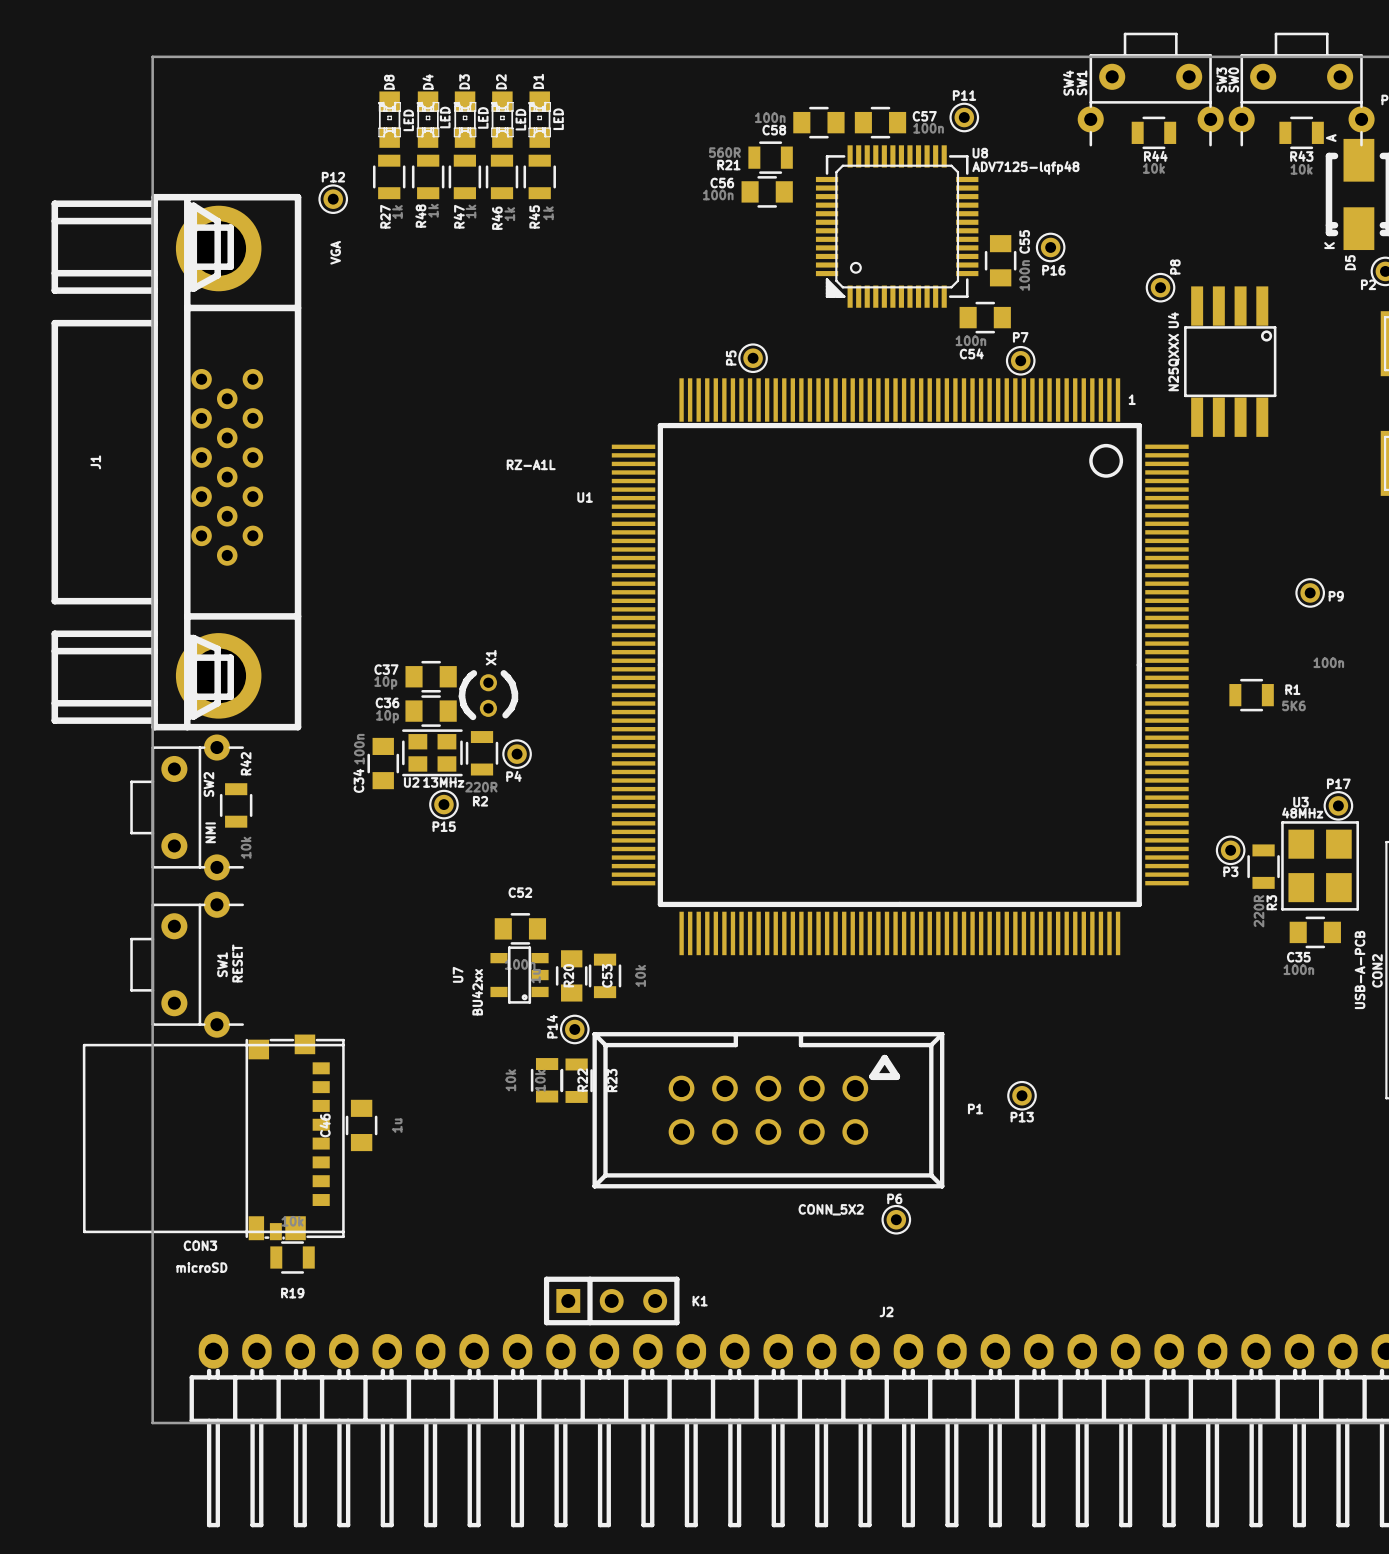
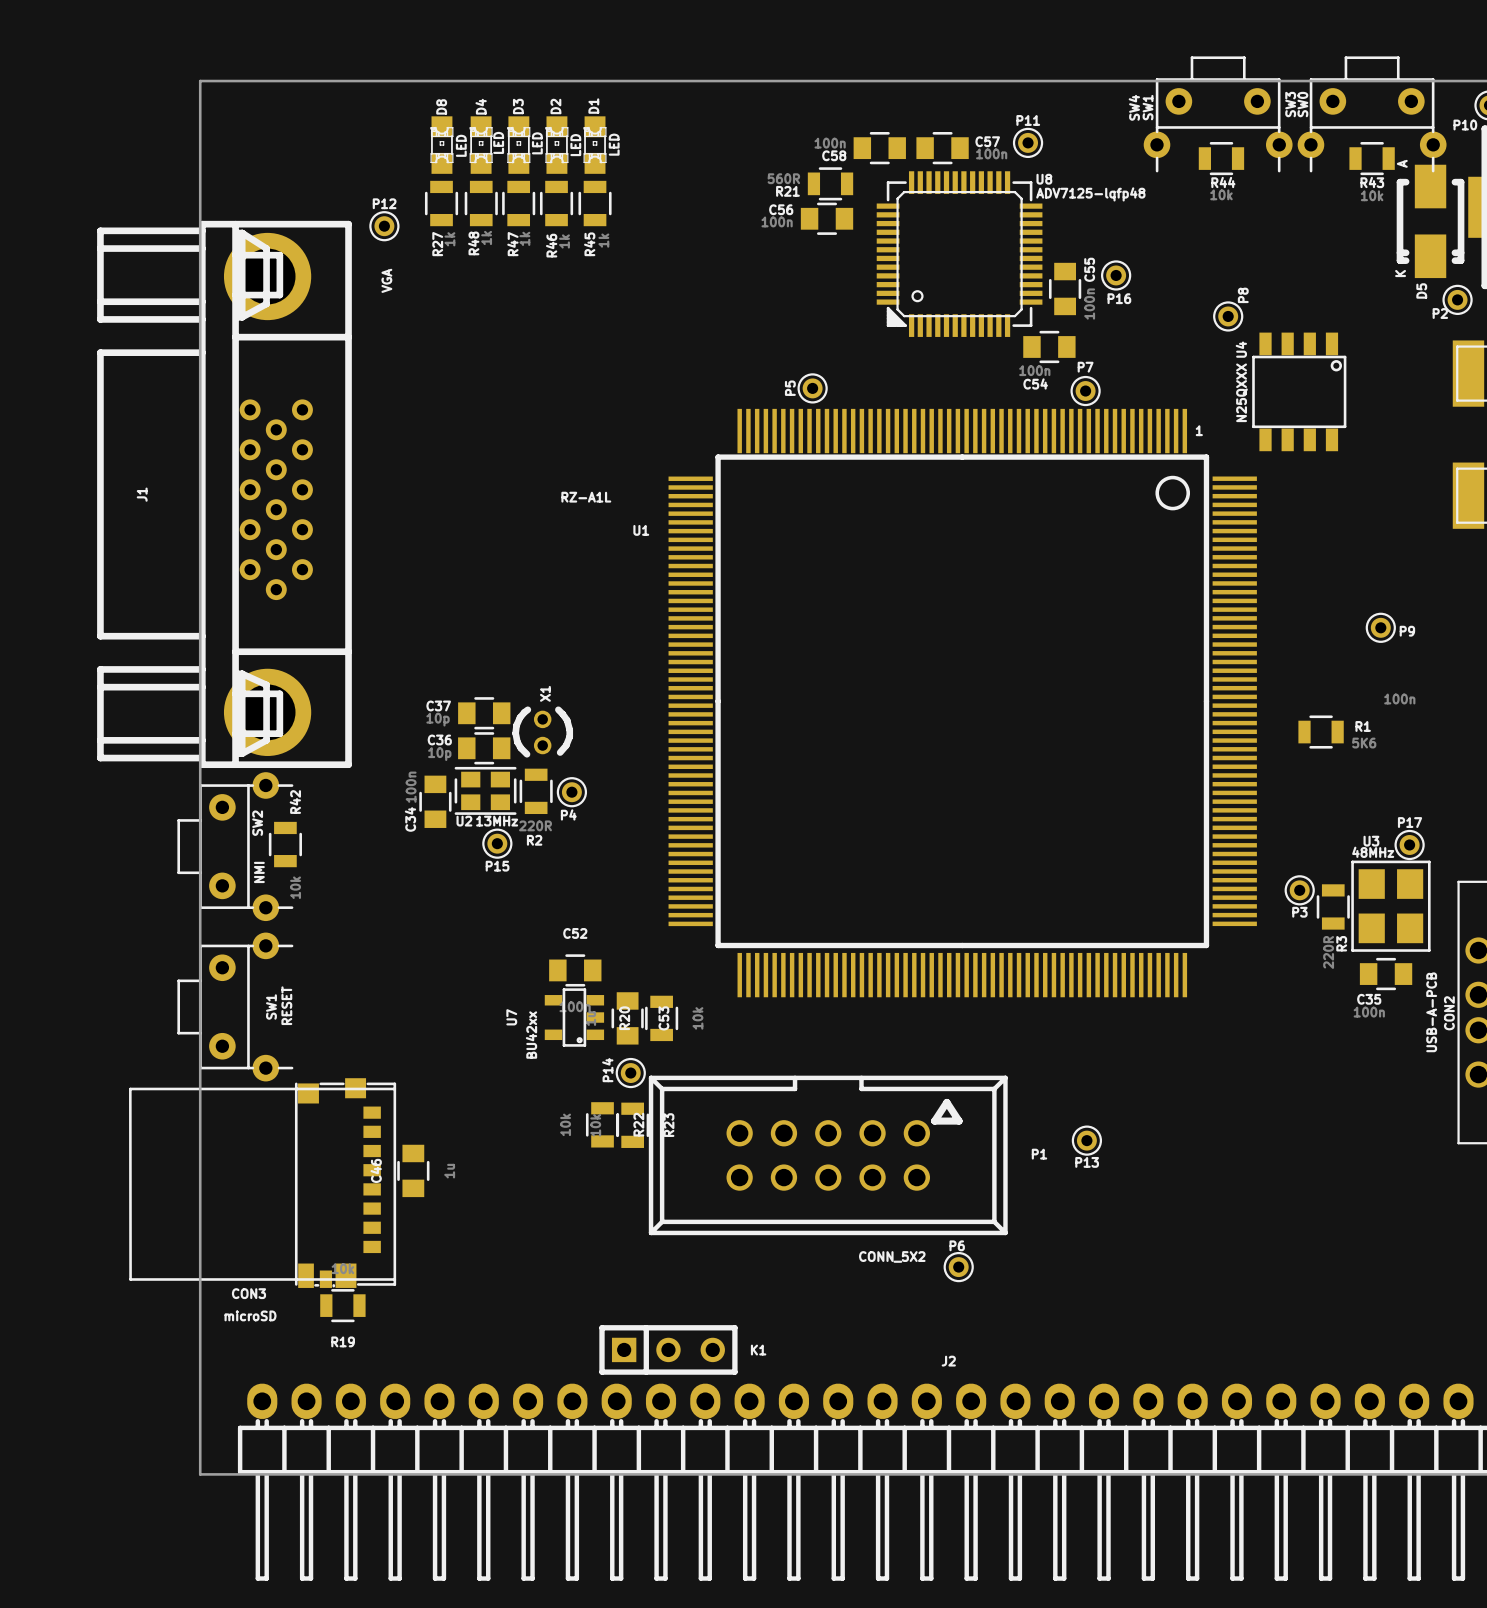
U4 footprint: [1184, 286, 1277, 437] -> [1252, 332, 1347, 452]

